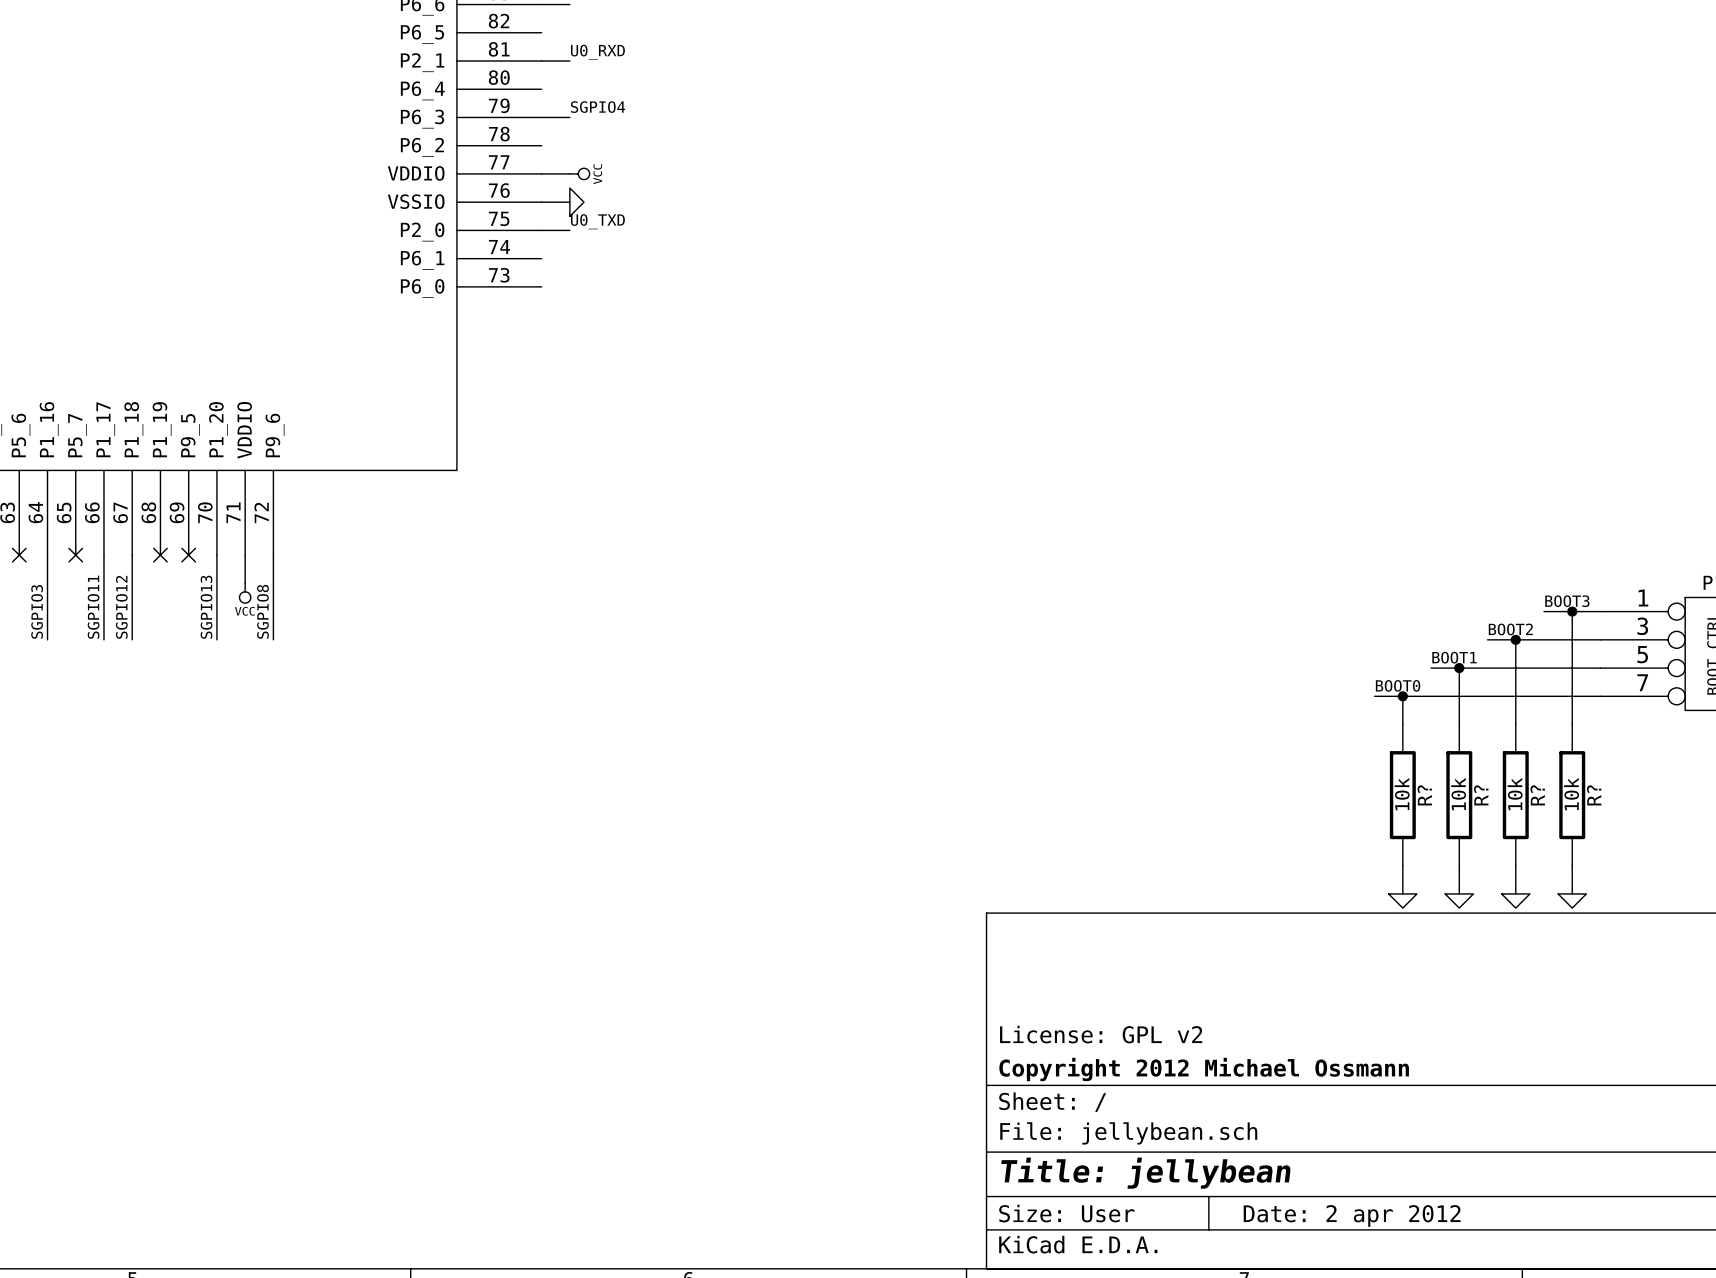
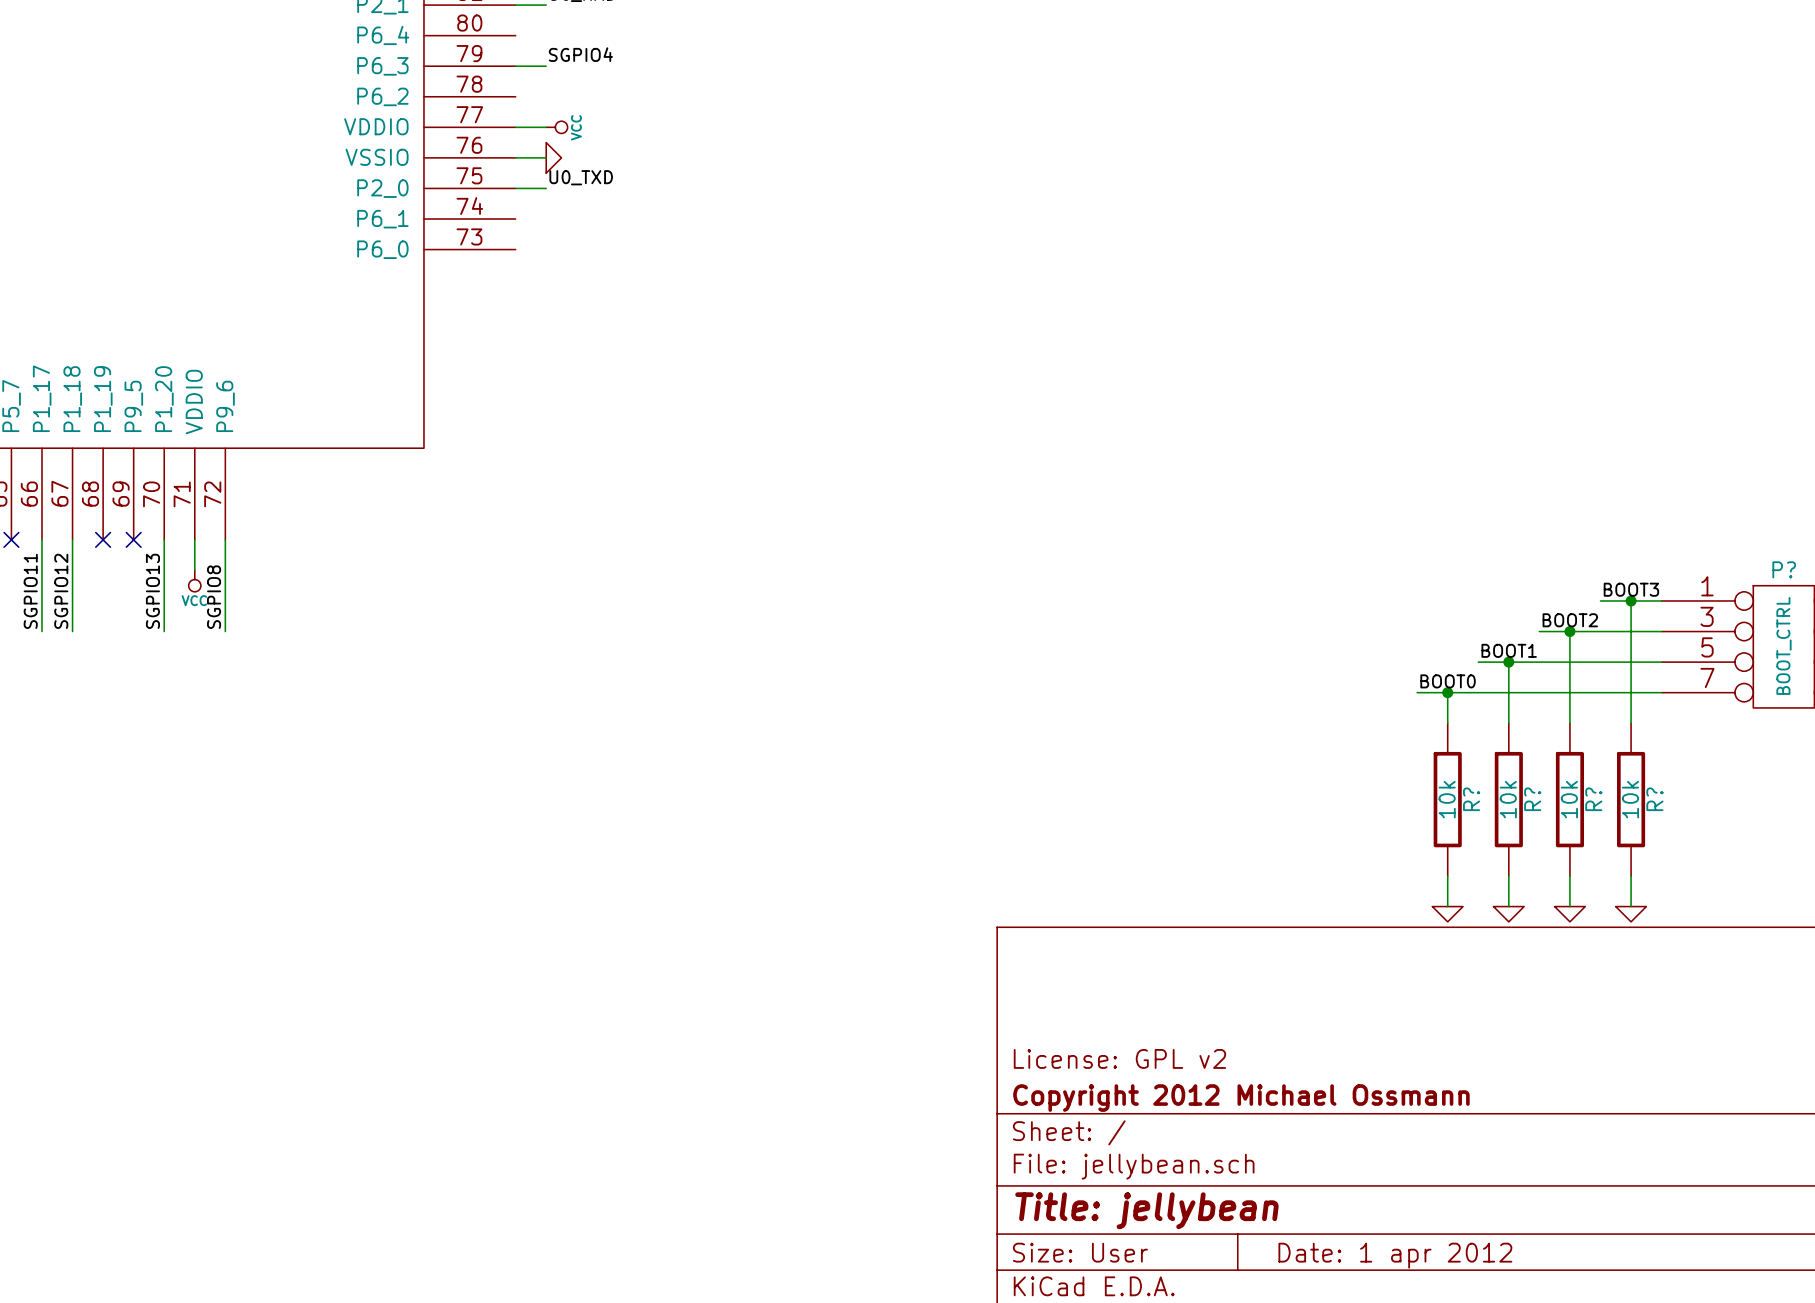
title block: Date: 2 apr 2012 (1352, 1215) -> Date: 1 apr 2012 (1395, 1255)

